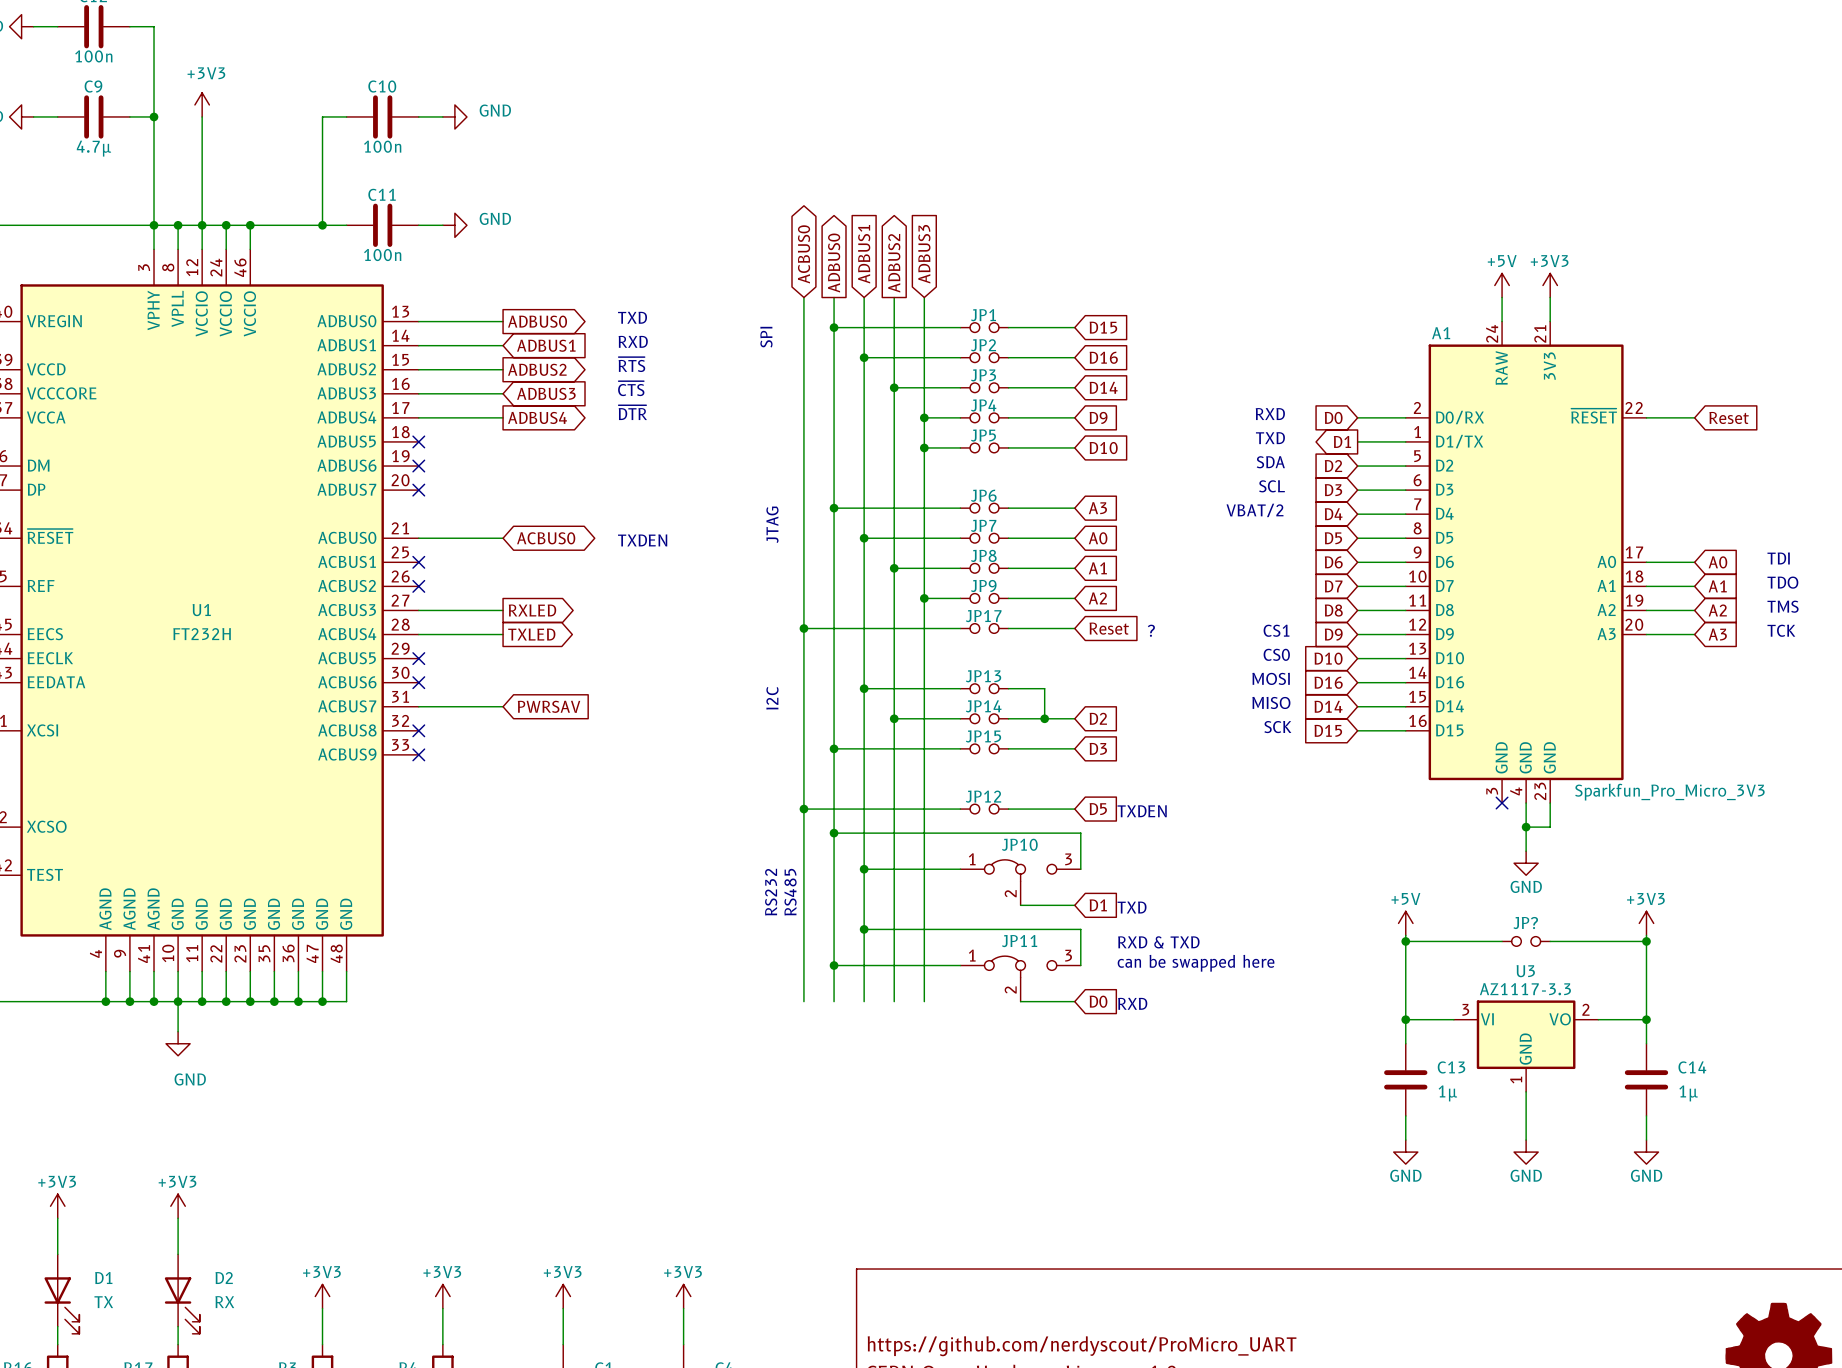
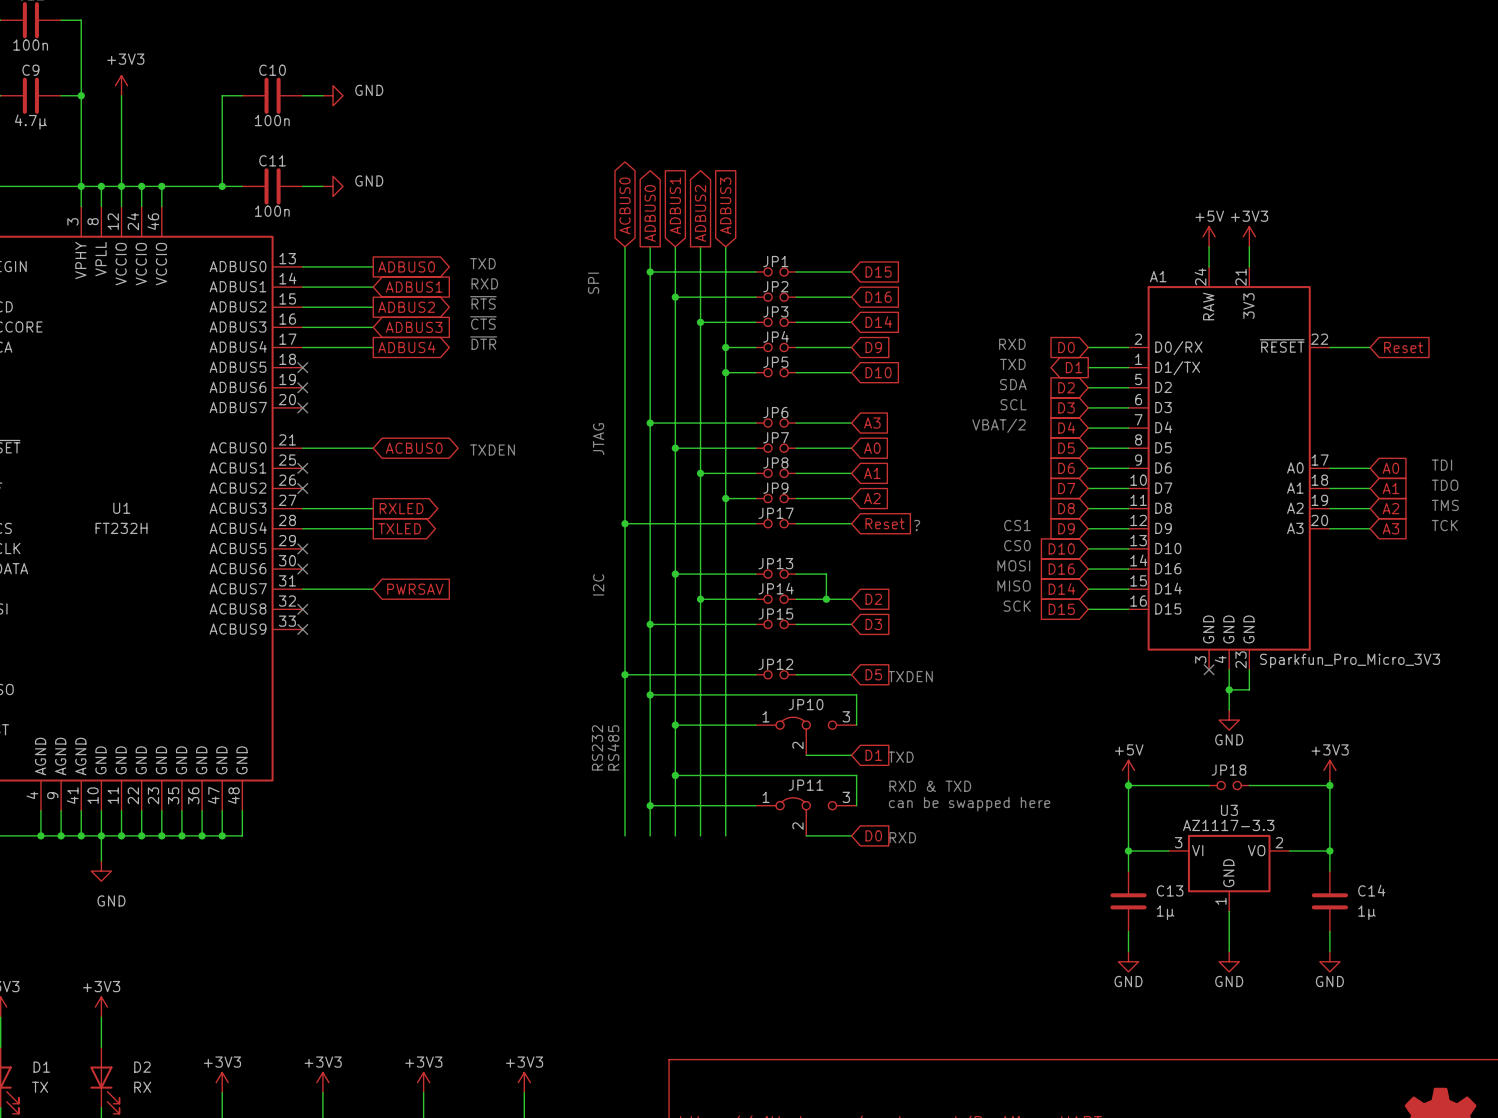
JP? name: JP? (1525, 923) -> JP18 (1228, 770)

